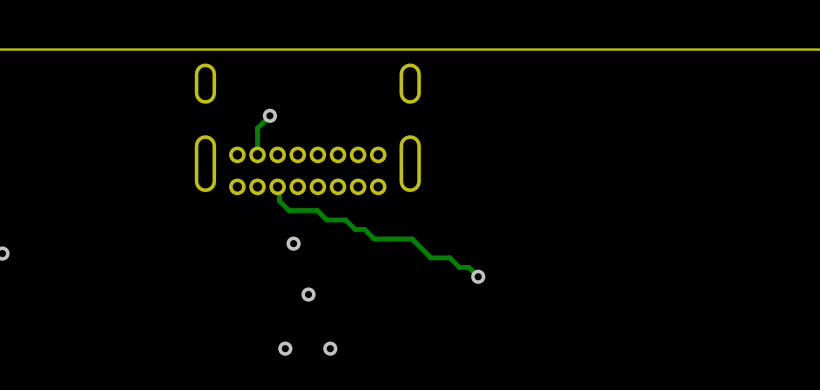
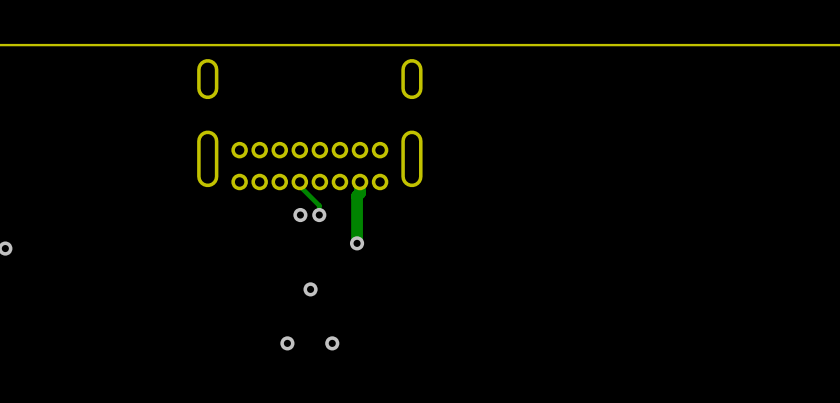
track: (269, 115) (257, 128) (257, 154) -> none
via: (269, 115) -> none
track: (277, 186) (279, 188) (279, 201) (288, 210) (317, 210) (326, 219) (345, 219) (355, 229) (364, 229) (374, 238) (411, 238) (430, 257) (449, 257) (459, 267) (468, 267) (478, 276) -> none
track: none -> (299, 181) (300, 186) (319, 205) (319, 215)
track: none -> (360, 181) (360, 193) (357, 196) (357, 243)
via: none -> (300, 215)
via: none -> (319, 215)
via: (293, 243) -> none
via: none -> (357, 243)
via: (478, 276) -> none

